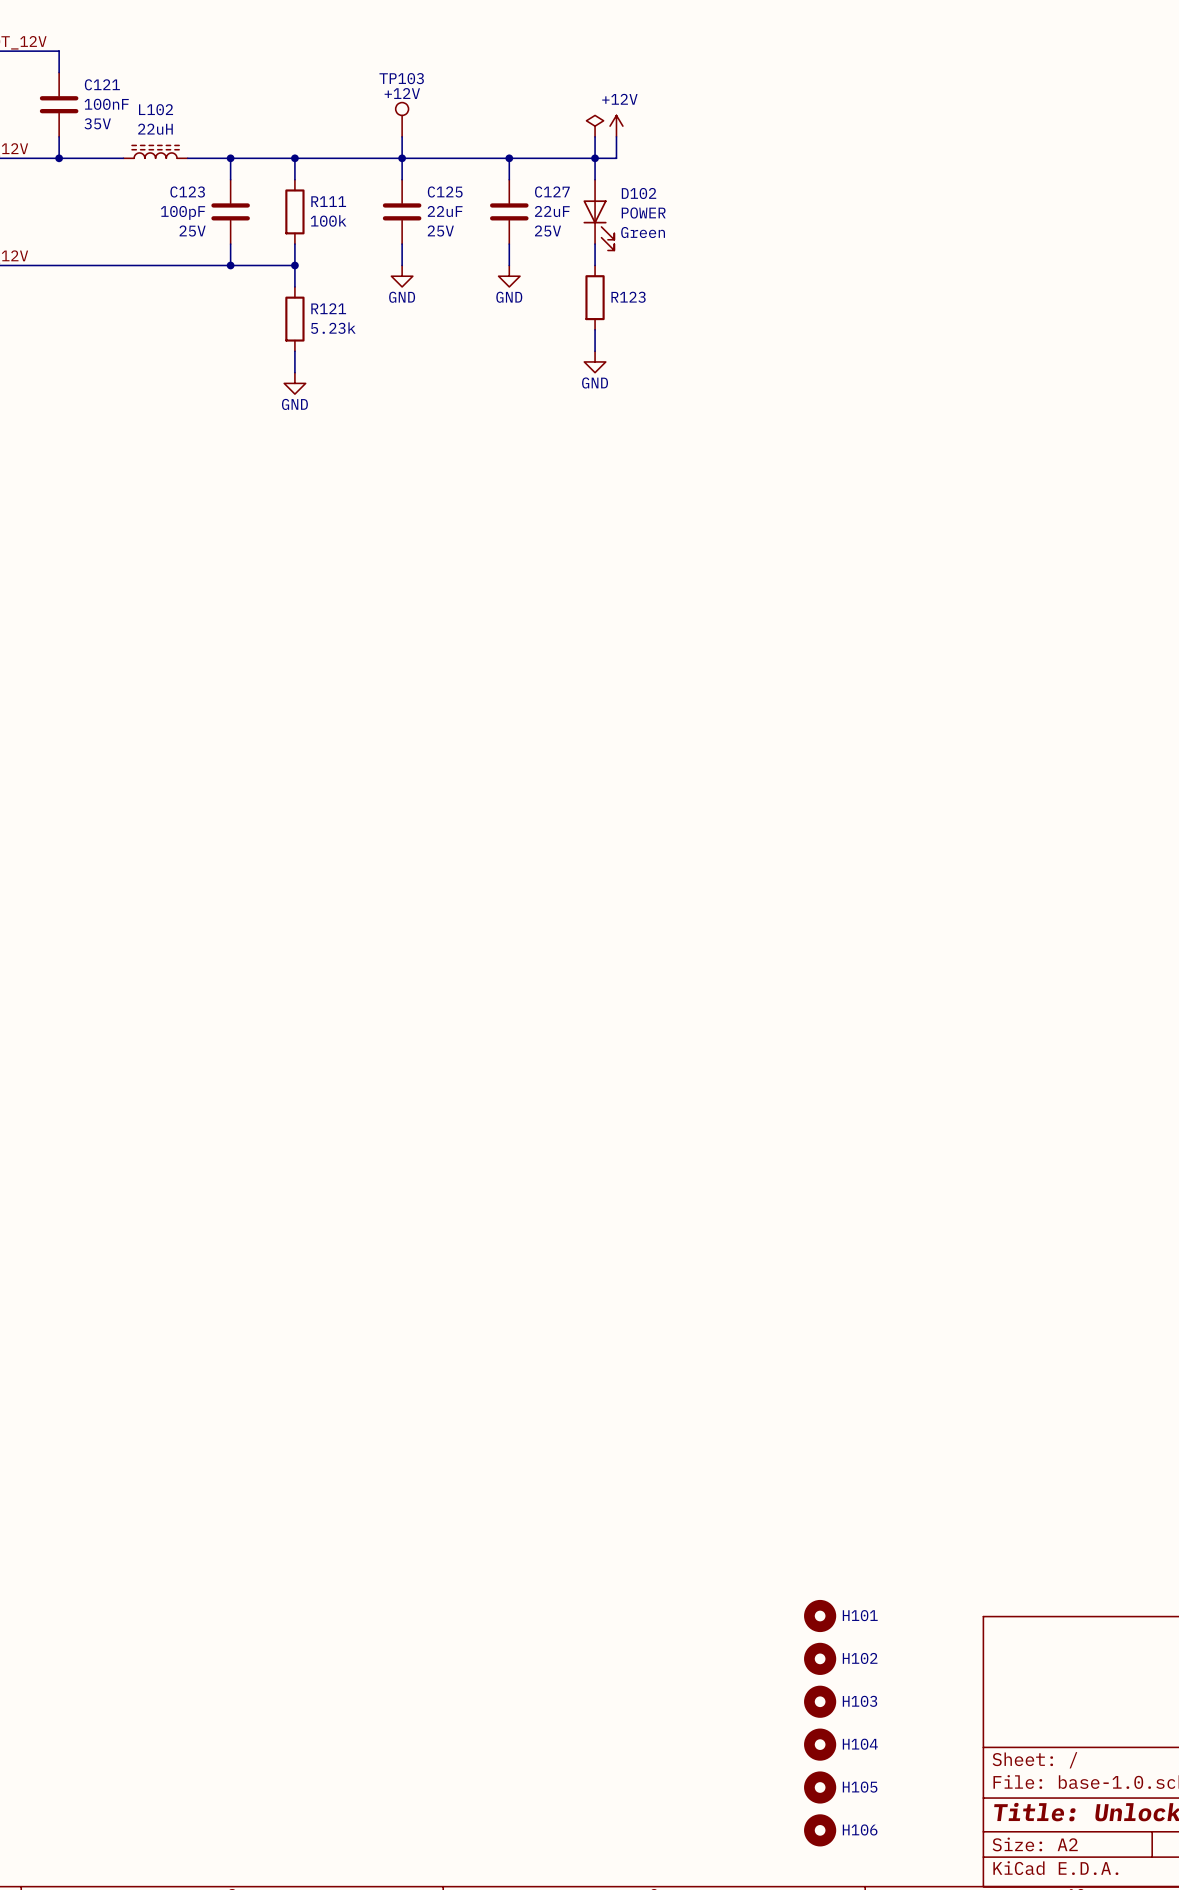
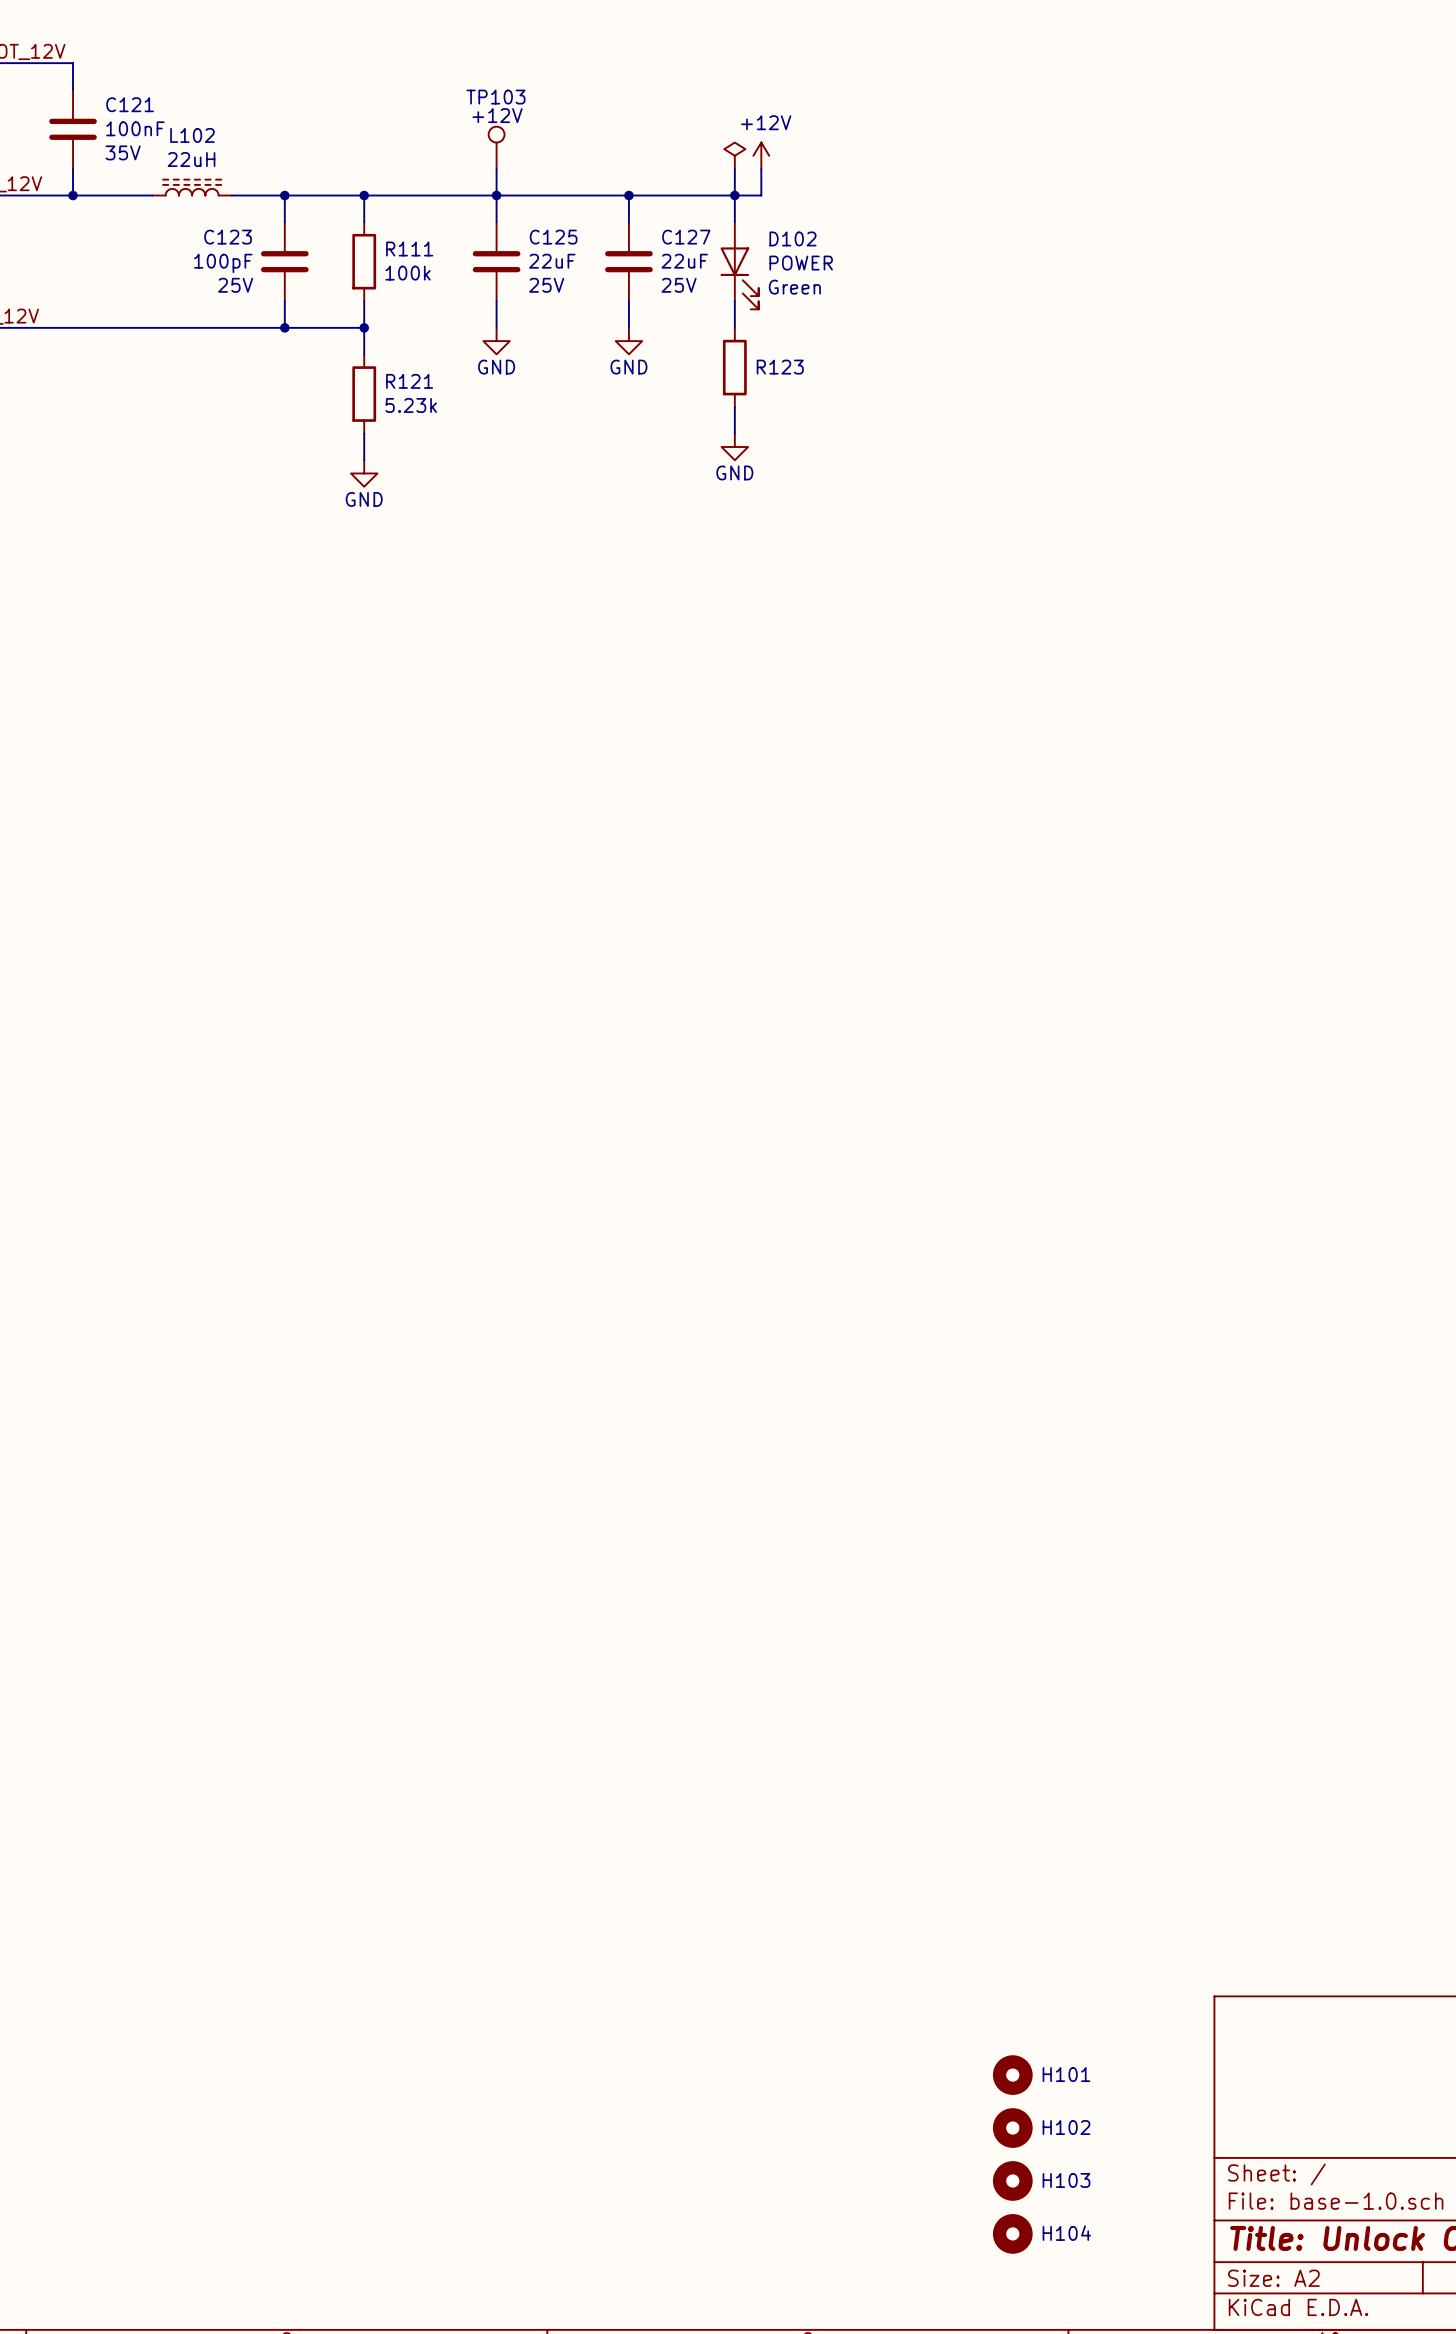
H101 position: (820, 1616) -> (1012, 2075)
H102 position: (820, 1658) -> (1012, 2128)
H103 position: (820, 1701) -> (1012, 2180)
H104 position: (820, 1744) -> (1012, 2233)
H105: (820, 1787) -> none
H106: (820, 1830) -> none

